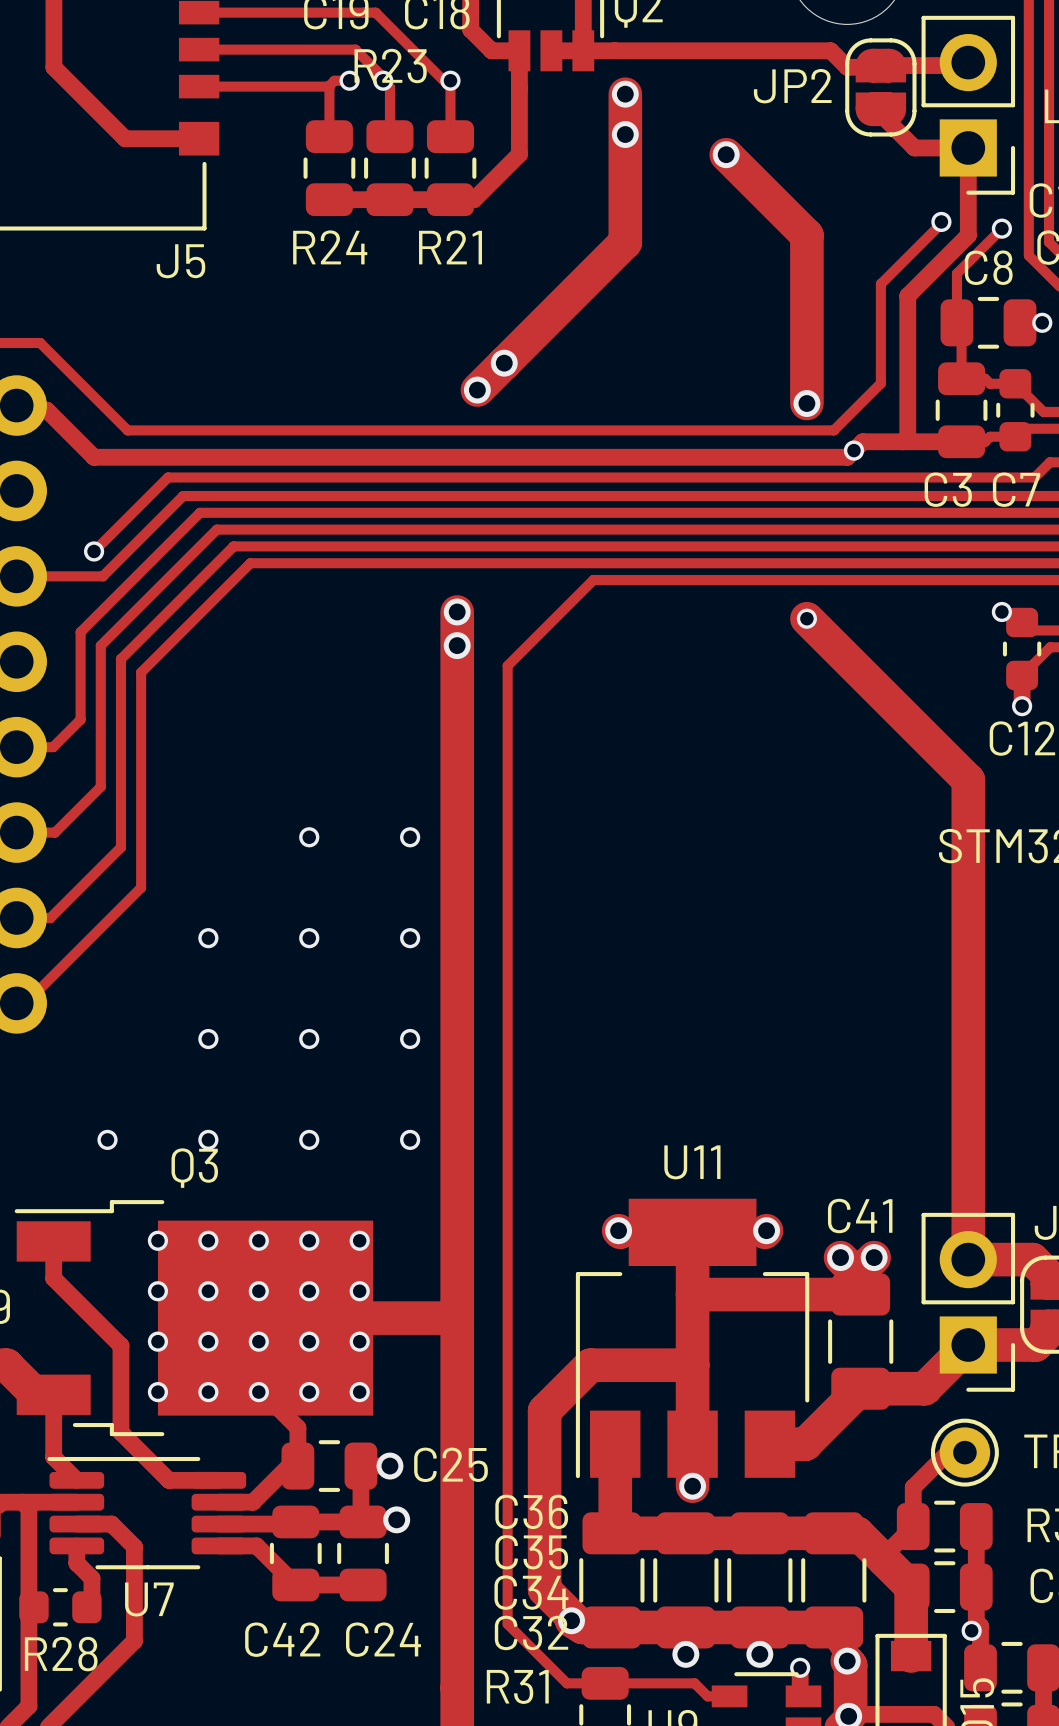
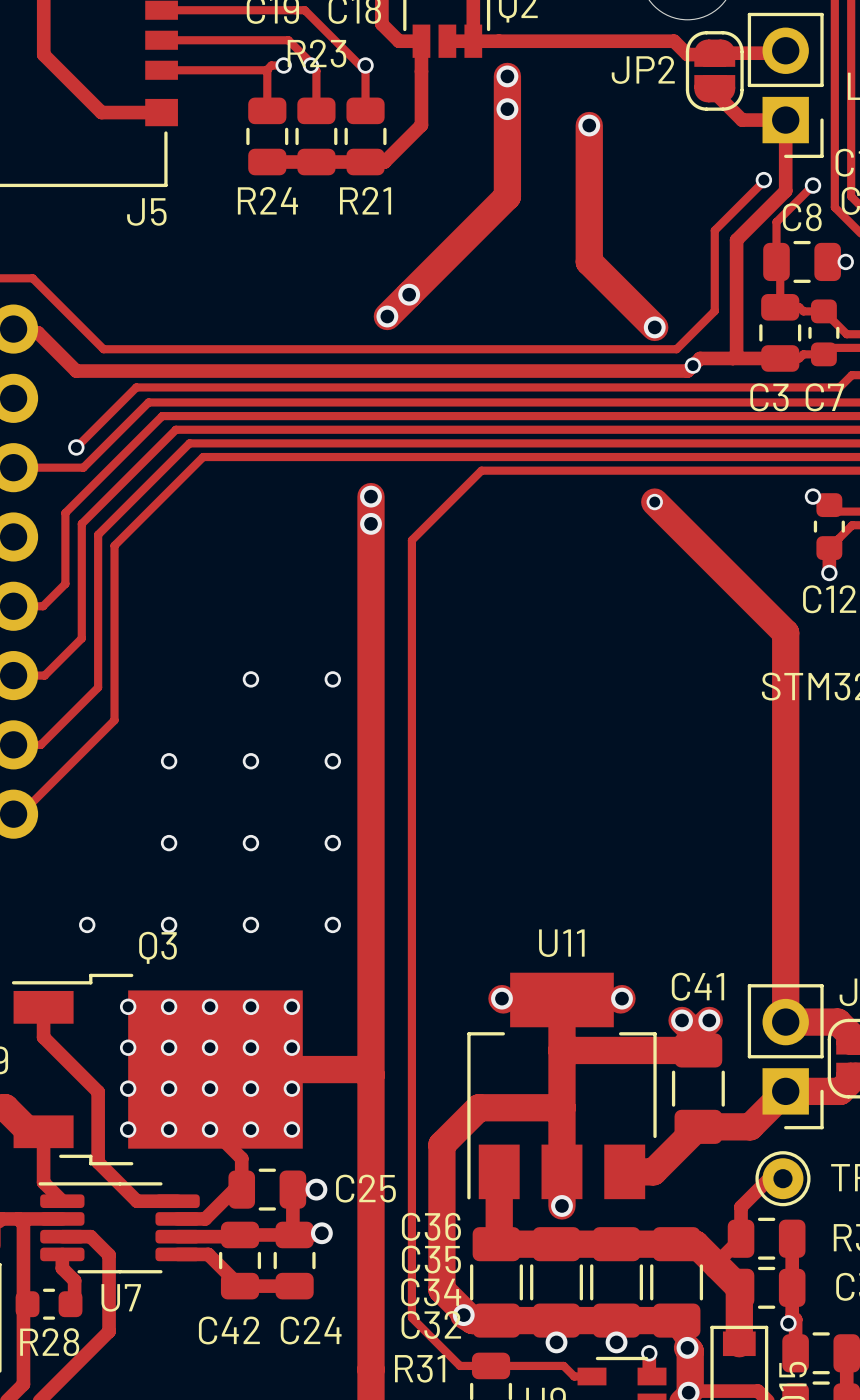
track: (726, 154) (806, 235) (806, 403) -> (589, 125) (589, 261) (654, 327)

